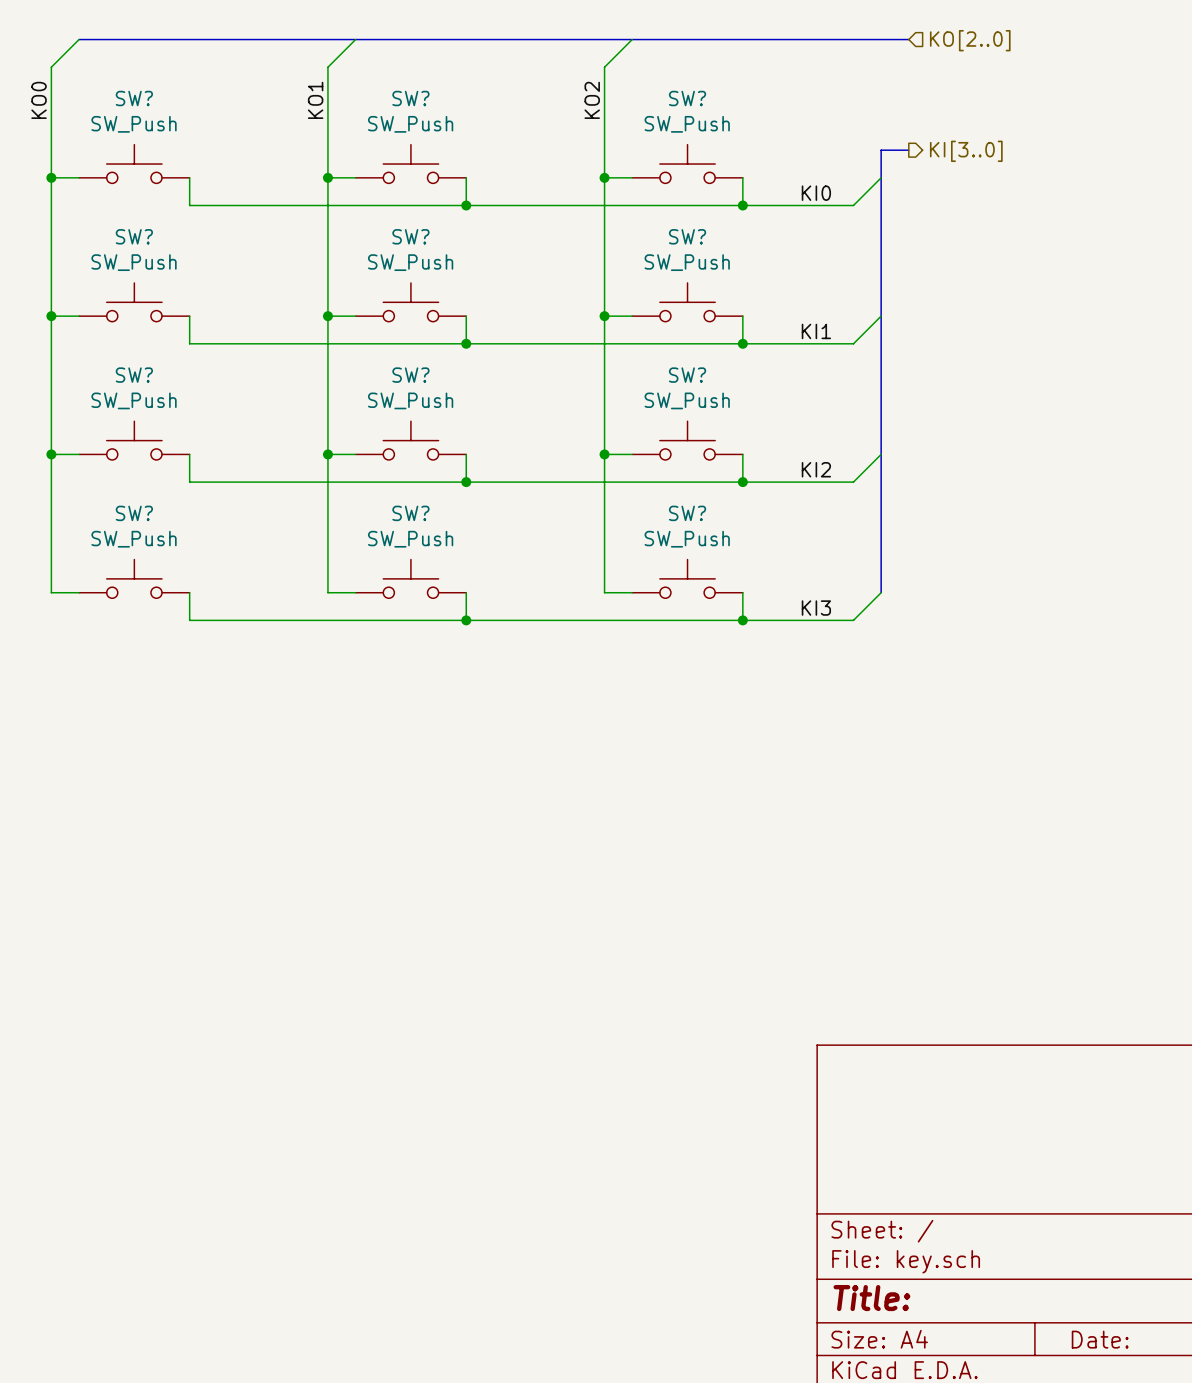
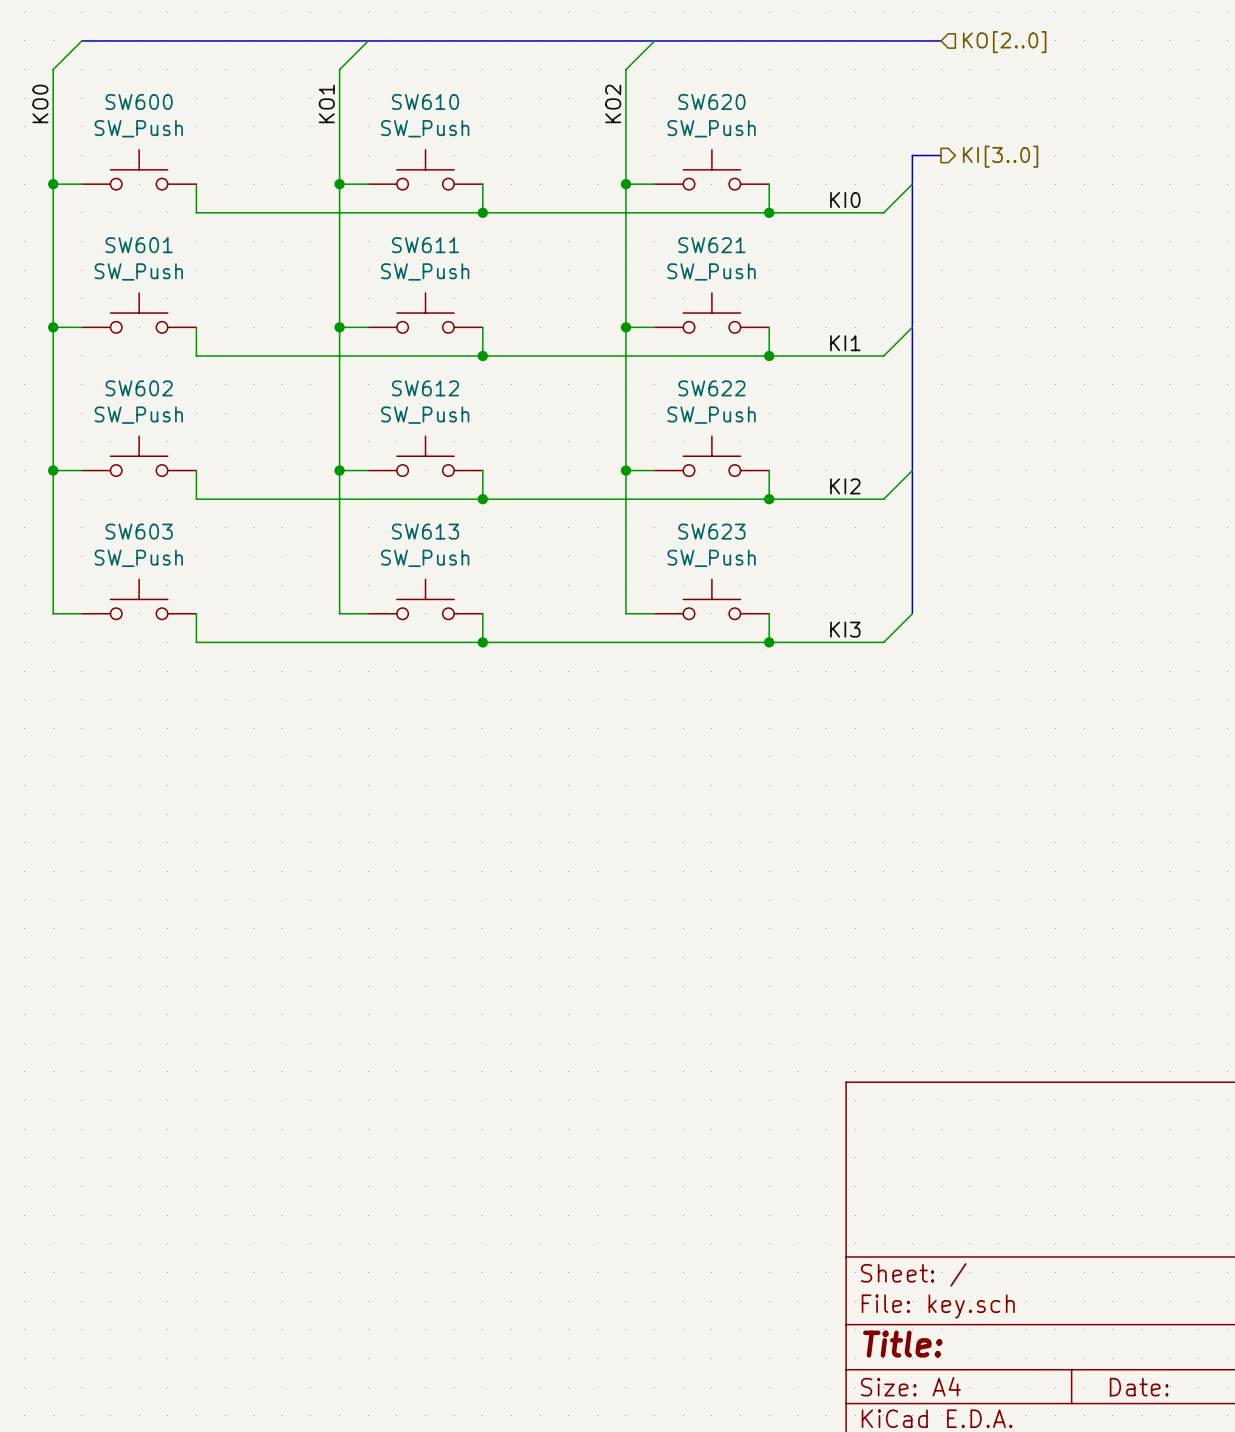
SW? name: SW? (134, 98) -> SW600 (139, 102)
SW? name: SW? (410, 98) -> SW610 (425, 102)
SW? name: SW? (687, 98) -> SW620 (711, 102)
SW? name: SW? (134, 236) -> SW601 (139, 245)
SW? name: SW? (410, 236) -> SW611 (425, 245)
SW? name: SW? (687, 236) -> SW621 (711, 245)
SW? name: SW? (134, 375) -> SW602 (139, 388)
SW? name: SW? (410, 375) -> SW612 (425, 388)
SW? name: SW? (687, 375) -> SW622 (711, 388)
SW? name: SW? (134, 513) -> SW603 (139, 531)
SW? name: SW? (410, 513) -> SW613 (425, 531)
SW? name: SW? (687, 513) -> SW623 (711, 531)

